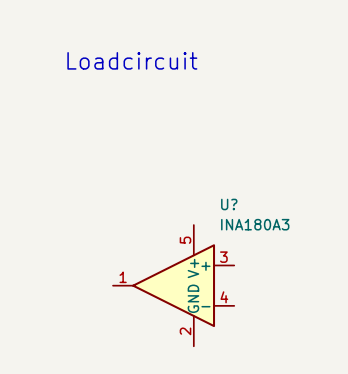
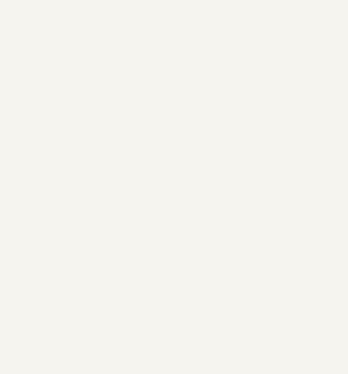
text: Loadcircuit (132, 60) -> none
U?: INA180A3 (173, 285) -> none

